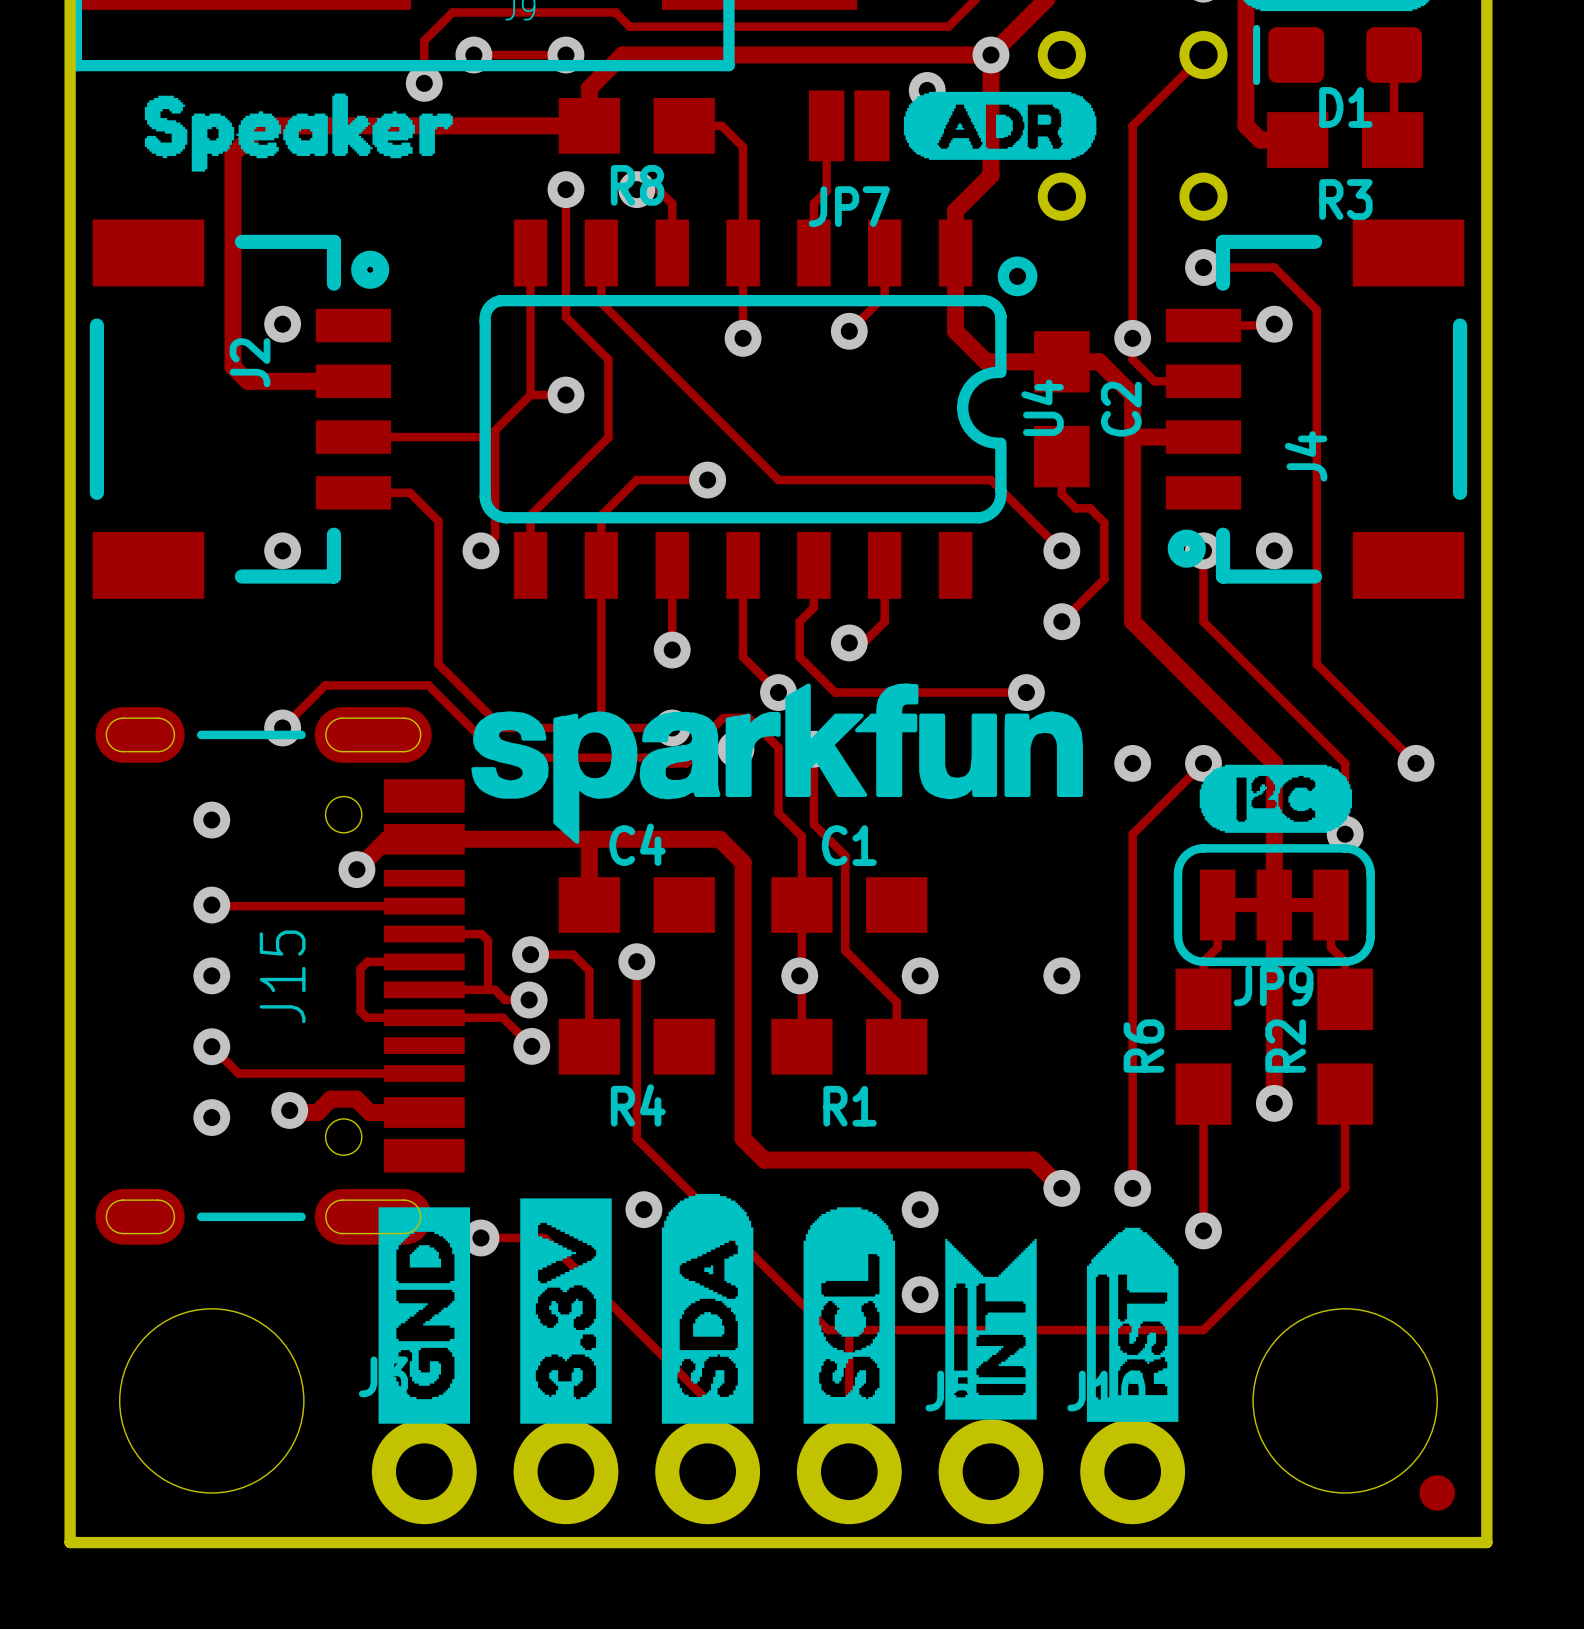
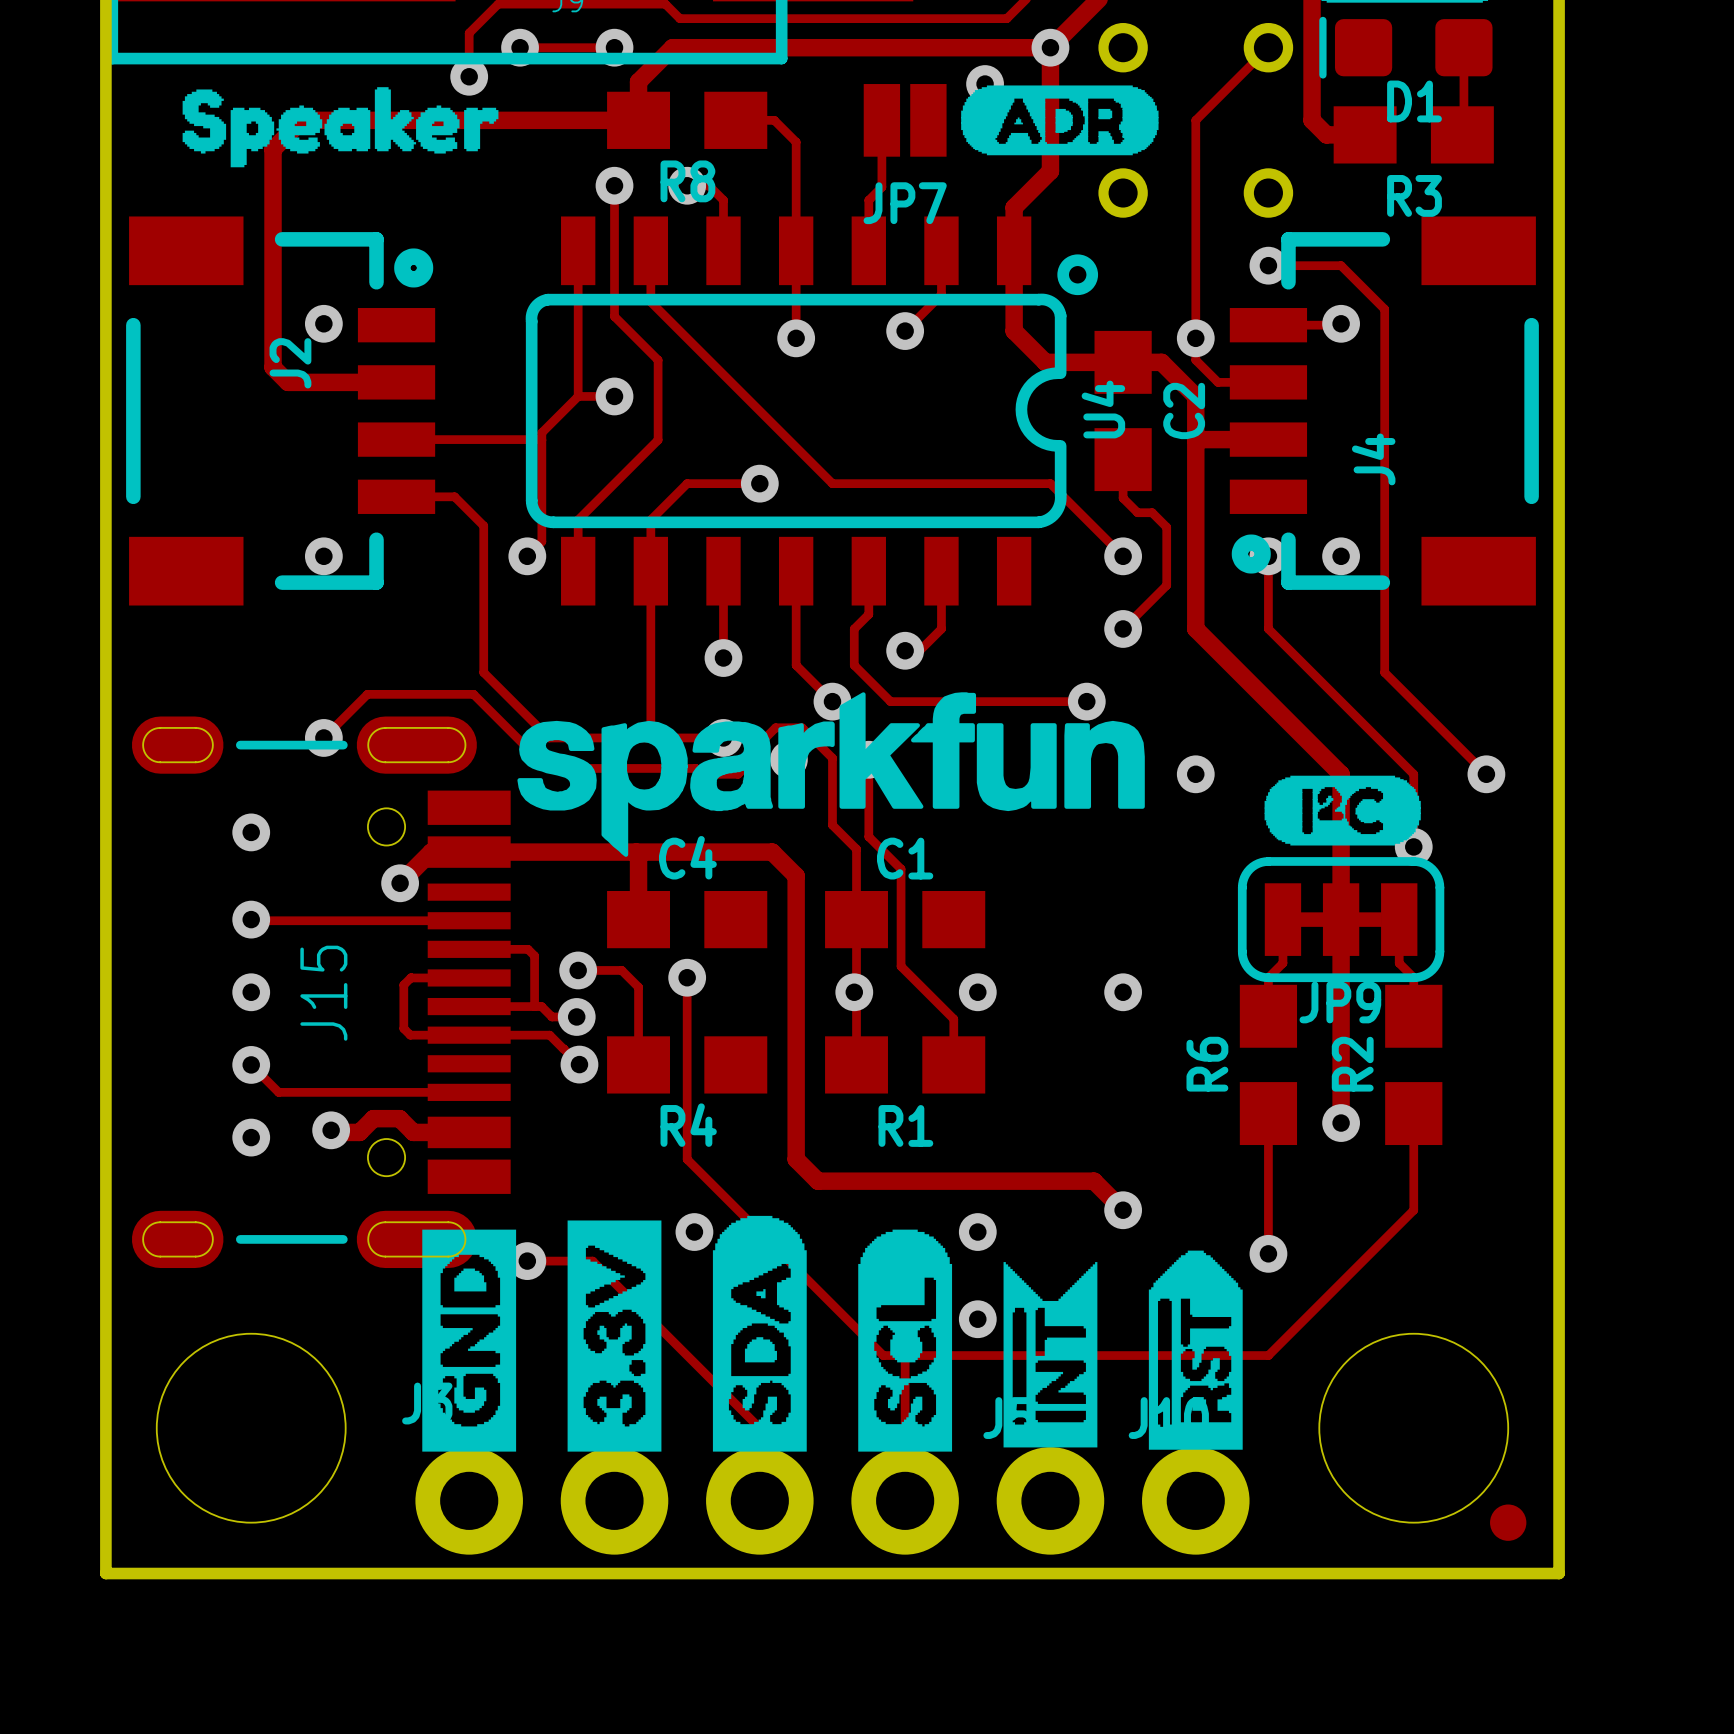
track: (1203, 763) (1132, 834) (1132, 1188) -> none
via: (1203, 763) -> none
via: (1132, 1188) -> none

